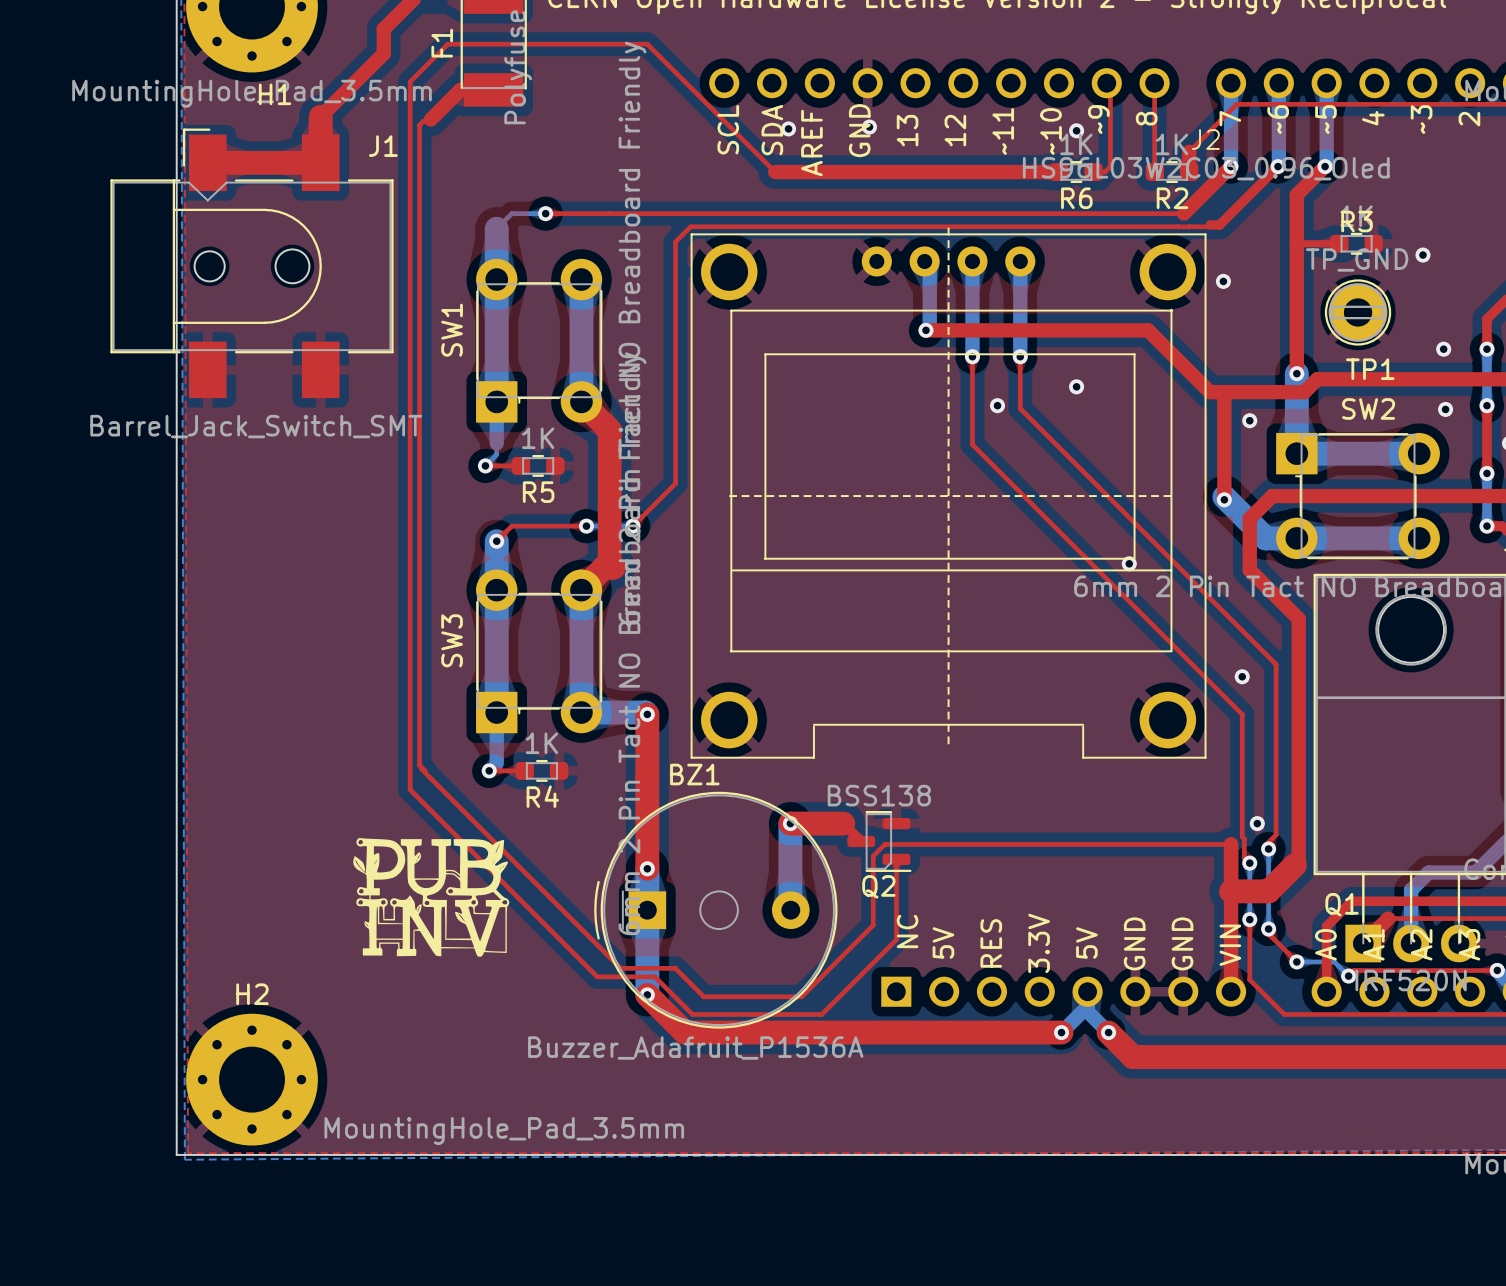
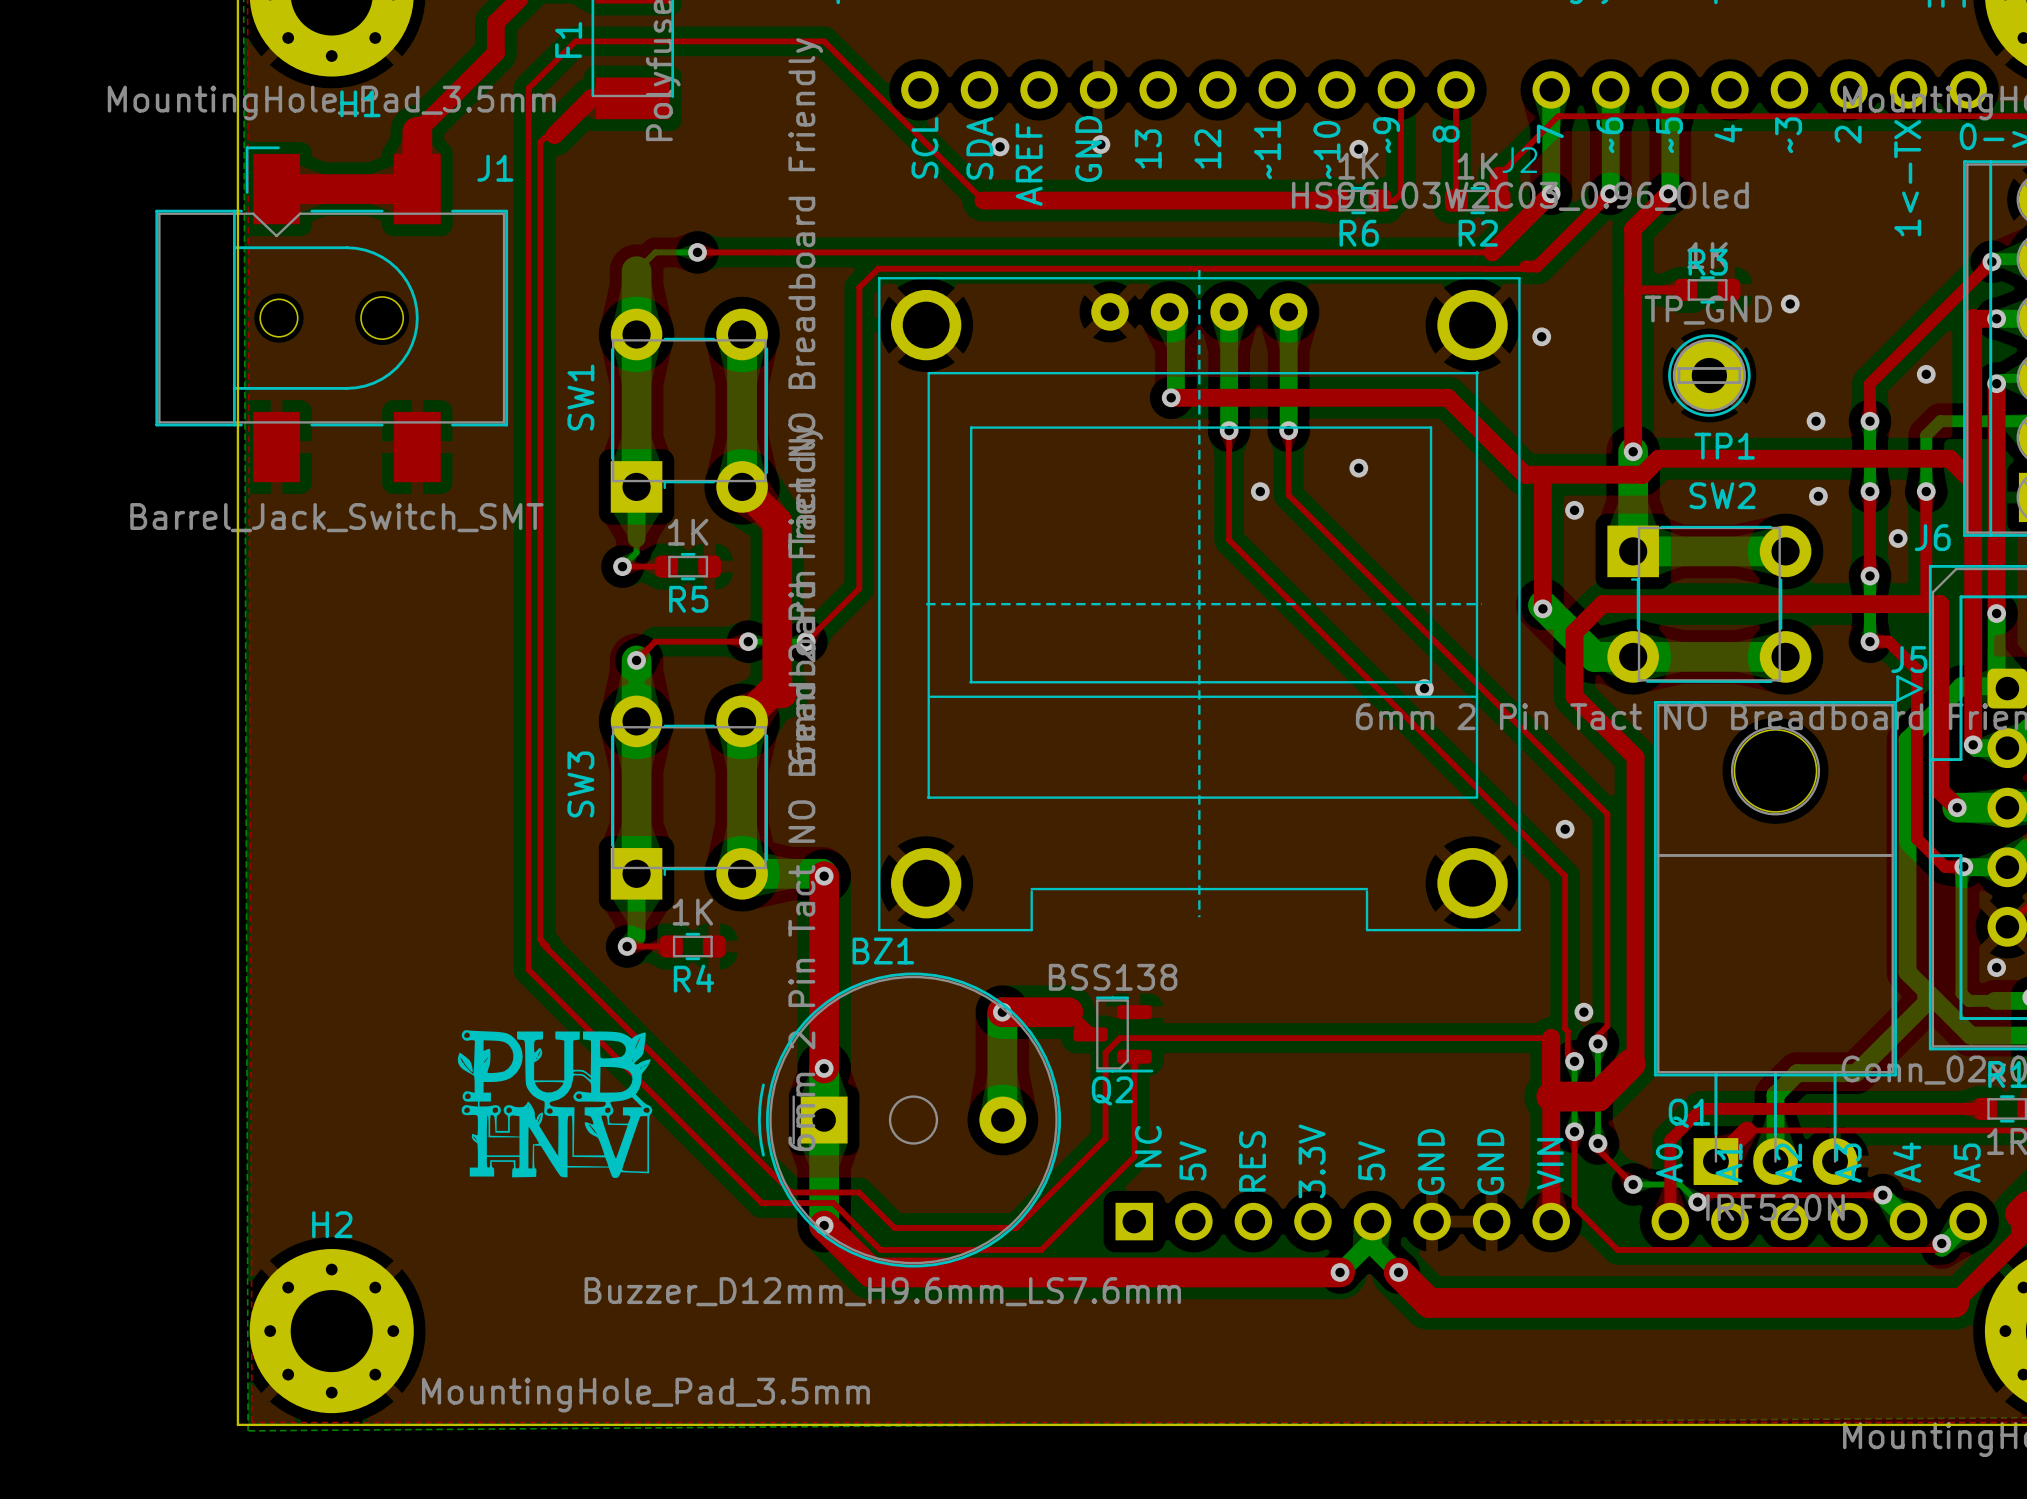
BZ1 value: Buzzer_Adafruit_P1536A (695, 1048) -> Buzzer_D12mm_H9.6mm_LS7.6mm (882, 1291)

